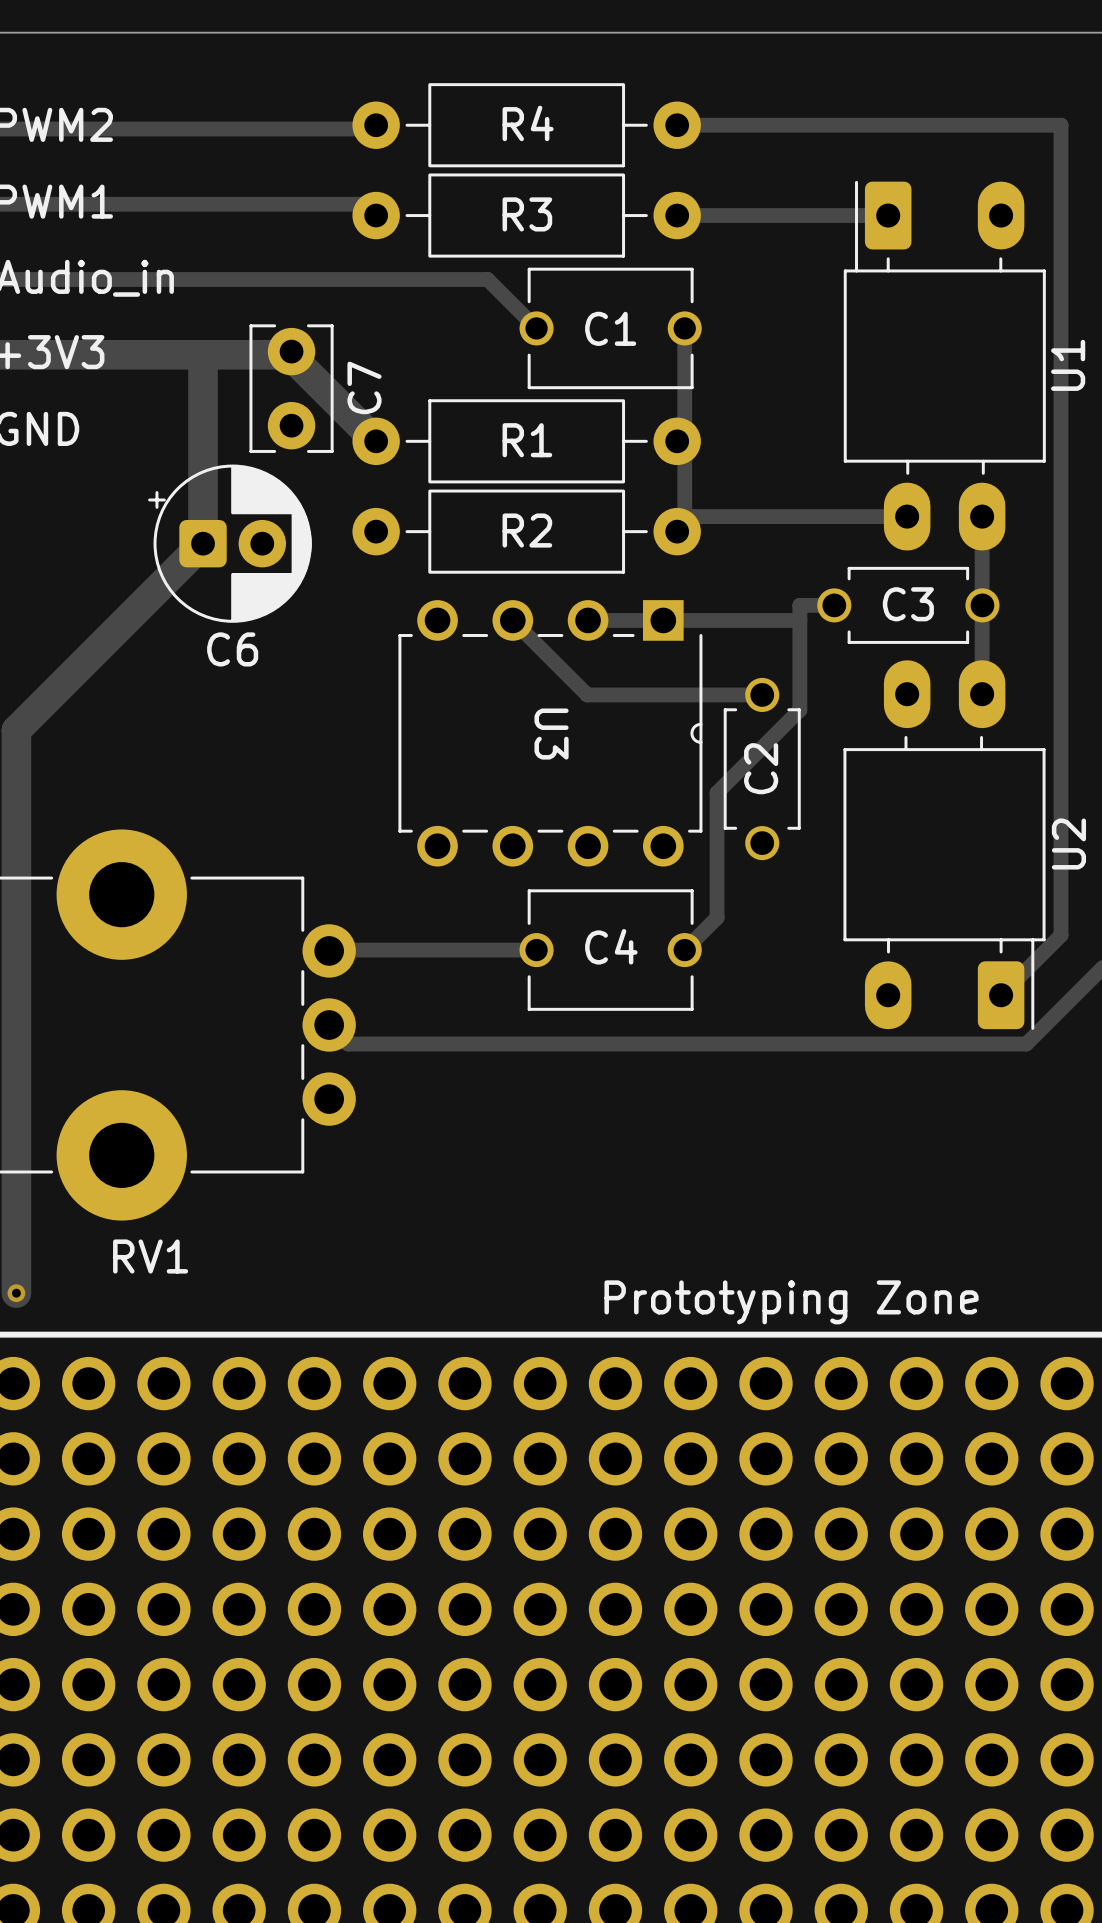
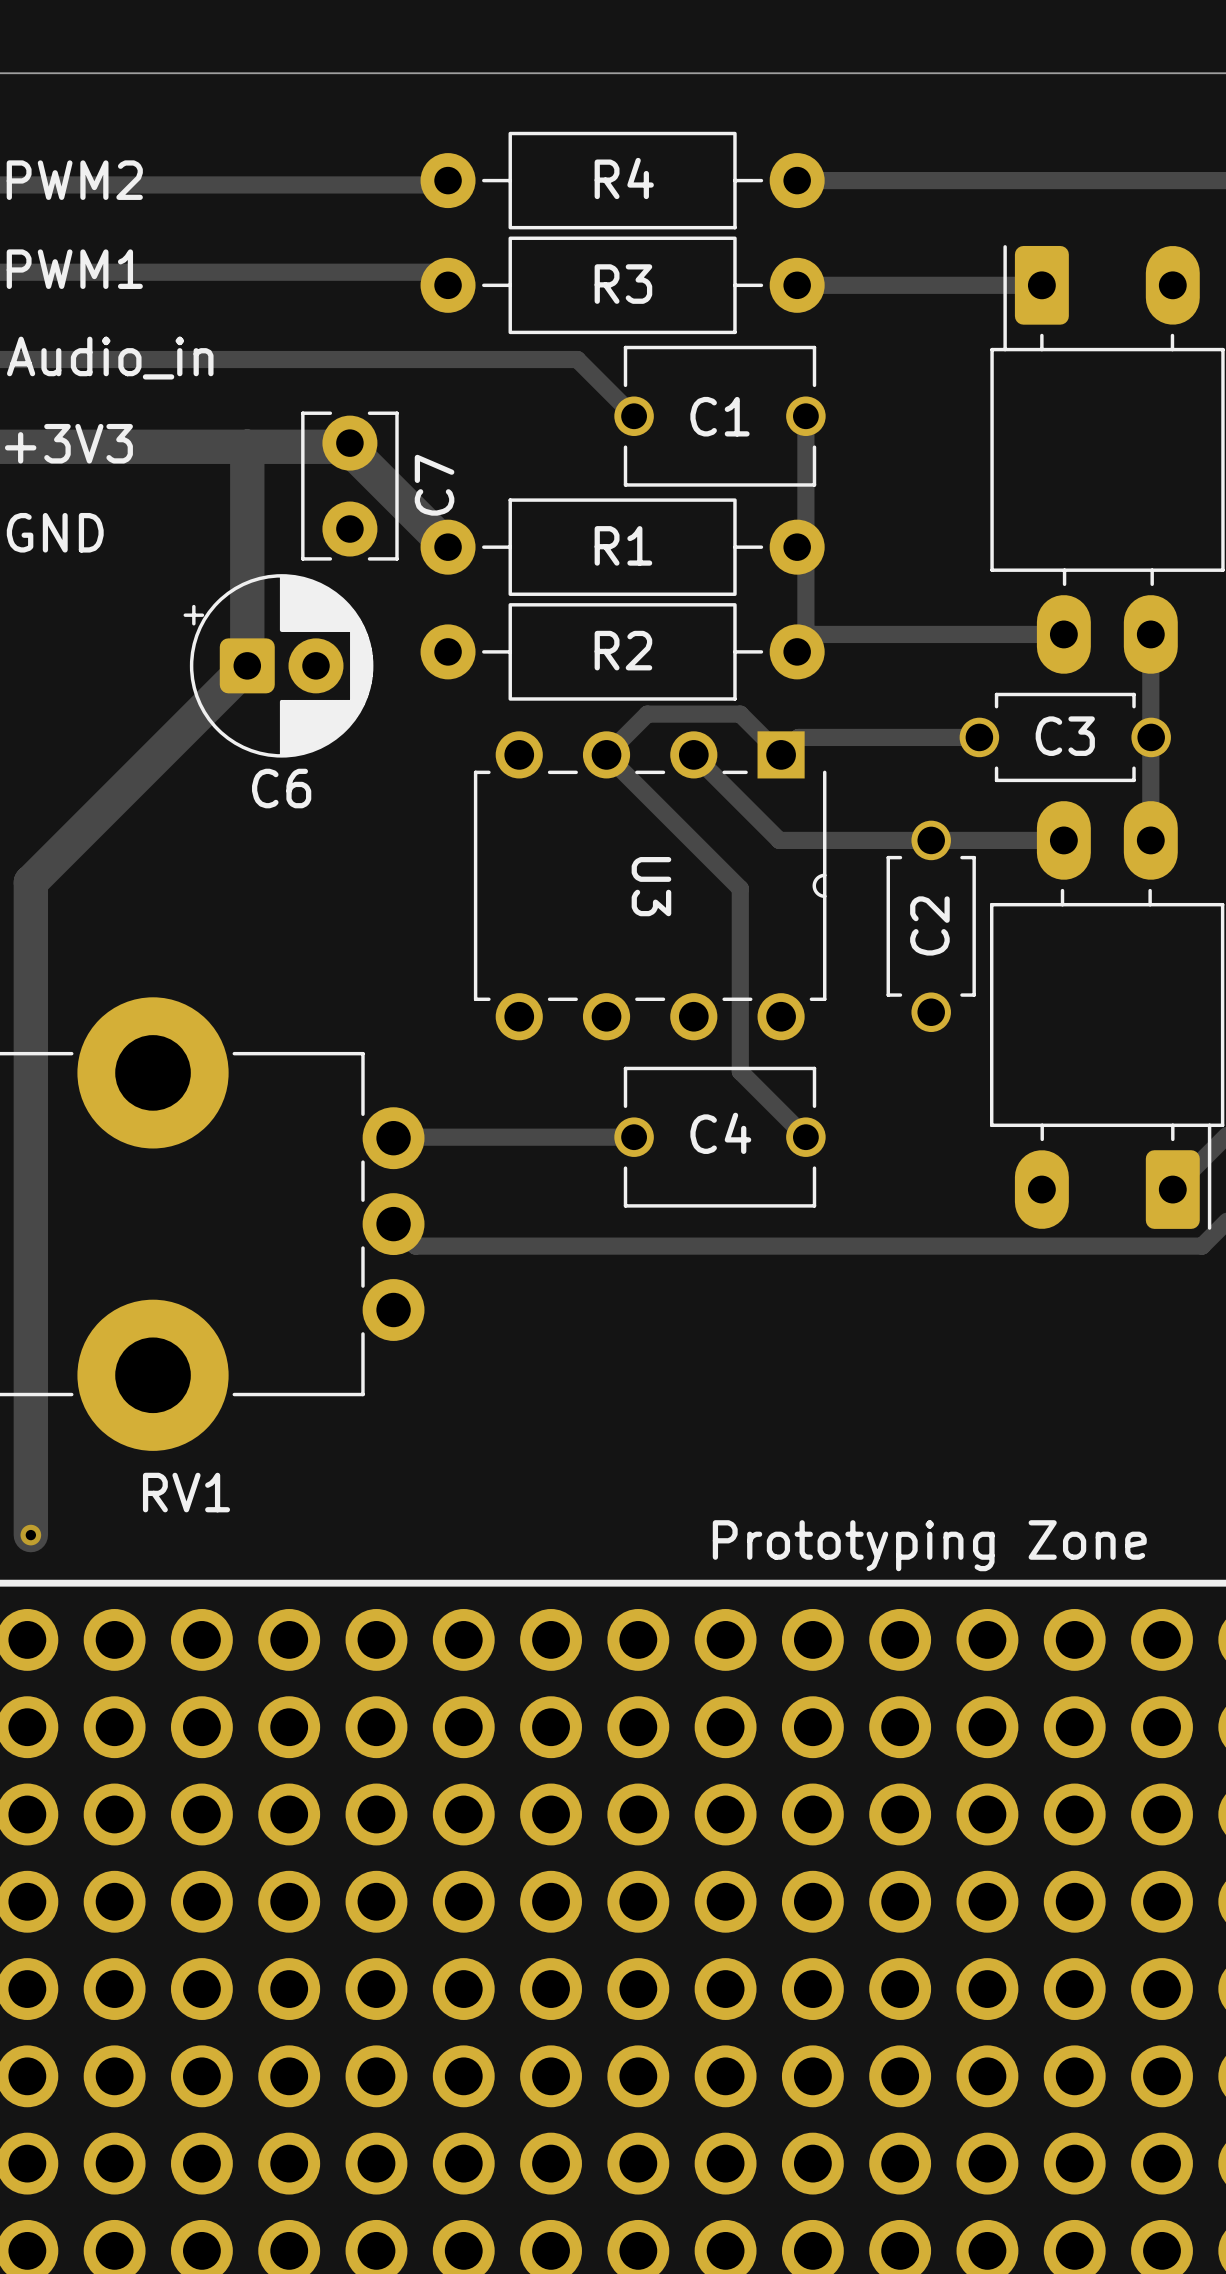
track: (799, 605) (799, 710) (717, 792) (717, 917) (684, 950) -> (692, 841) (740, 888) (740, 1071) (805, 1137)
track: none -> (939, 737) (798, 737) (781, 754) (740, 714) (647, 714) (606, 754)
track: (799, 619) (588, 620) -> (1063, 840) (779, 840) (693, 754)
track: (587, 694) (762, 694) -> none
C2 position: (762, 769) -> (931, 926)

